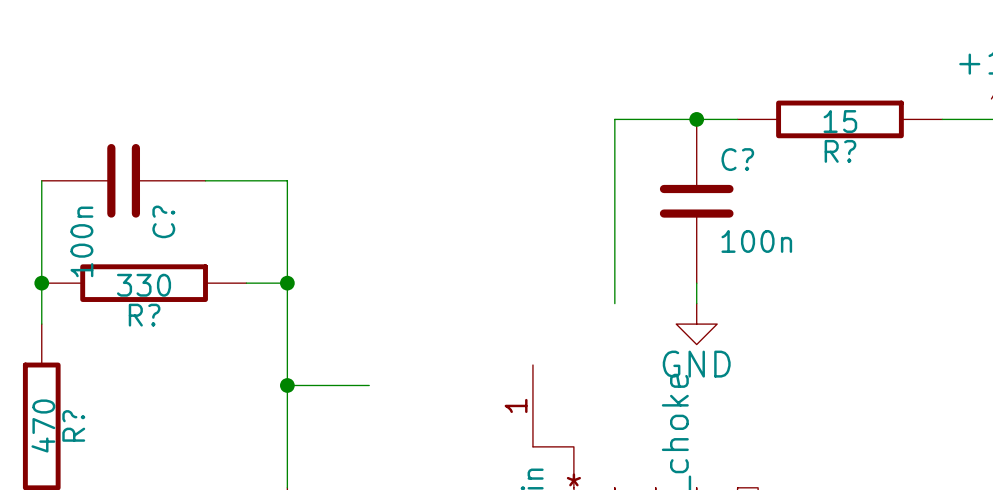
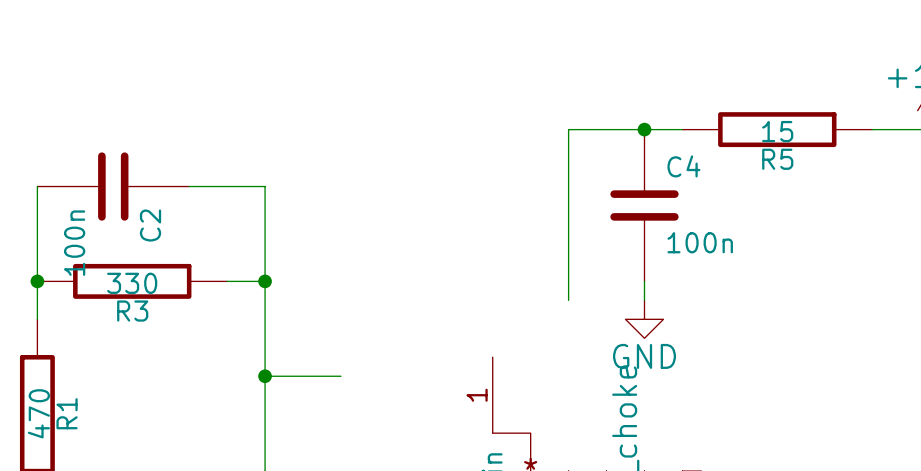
R? name: R? (840, 151) -> R5 (777, 159)
C? name: C? (737, 159) -> C4 (683, 166)
C? name: C? (163, 221) -> C2 (150, 225)
R? name: R? (144, 315) -> R3 (132, 311)
R? name: R? (73, 425) -> R1 (67, 413)

